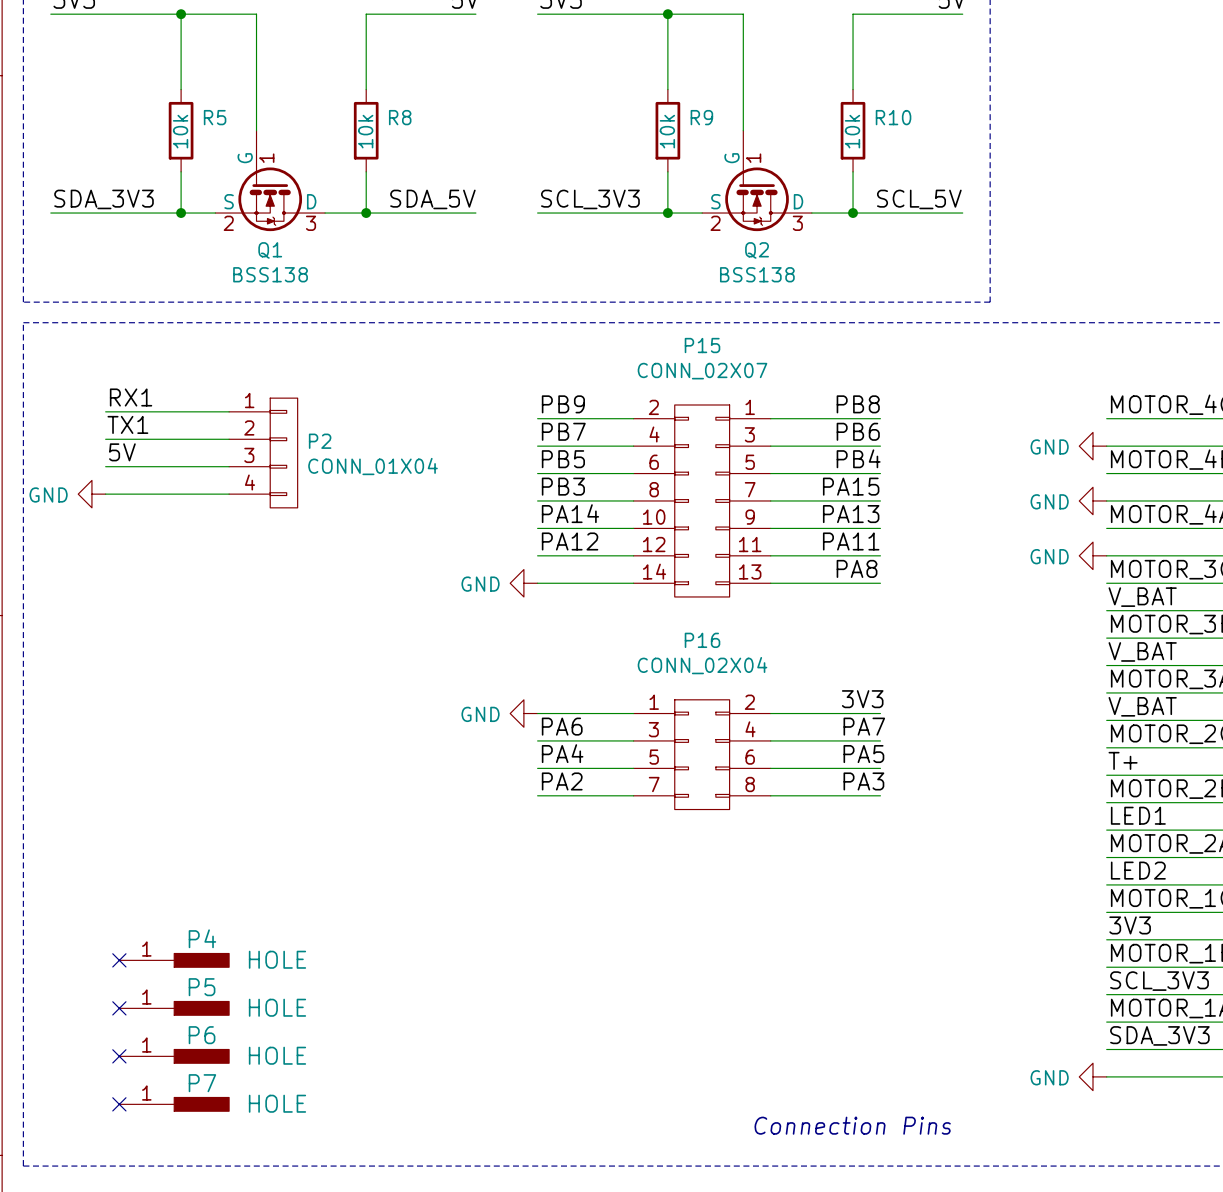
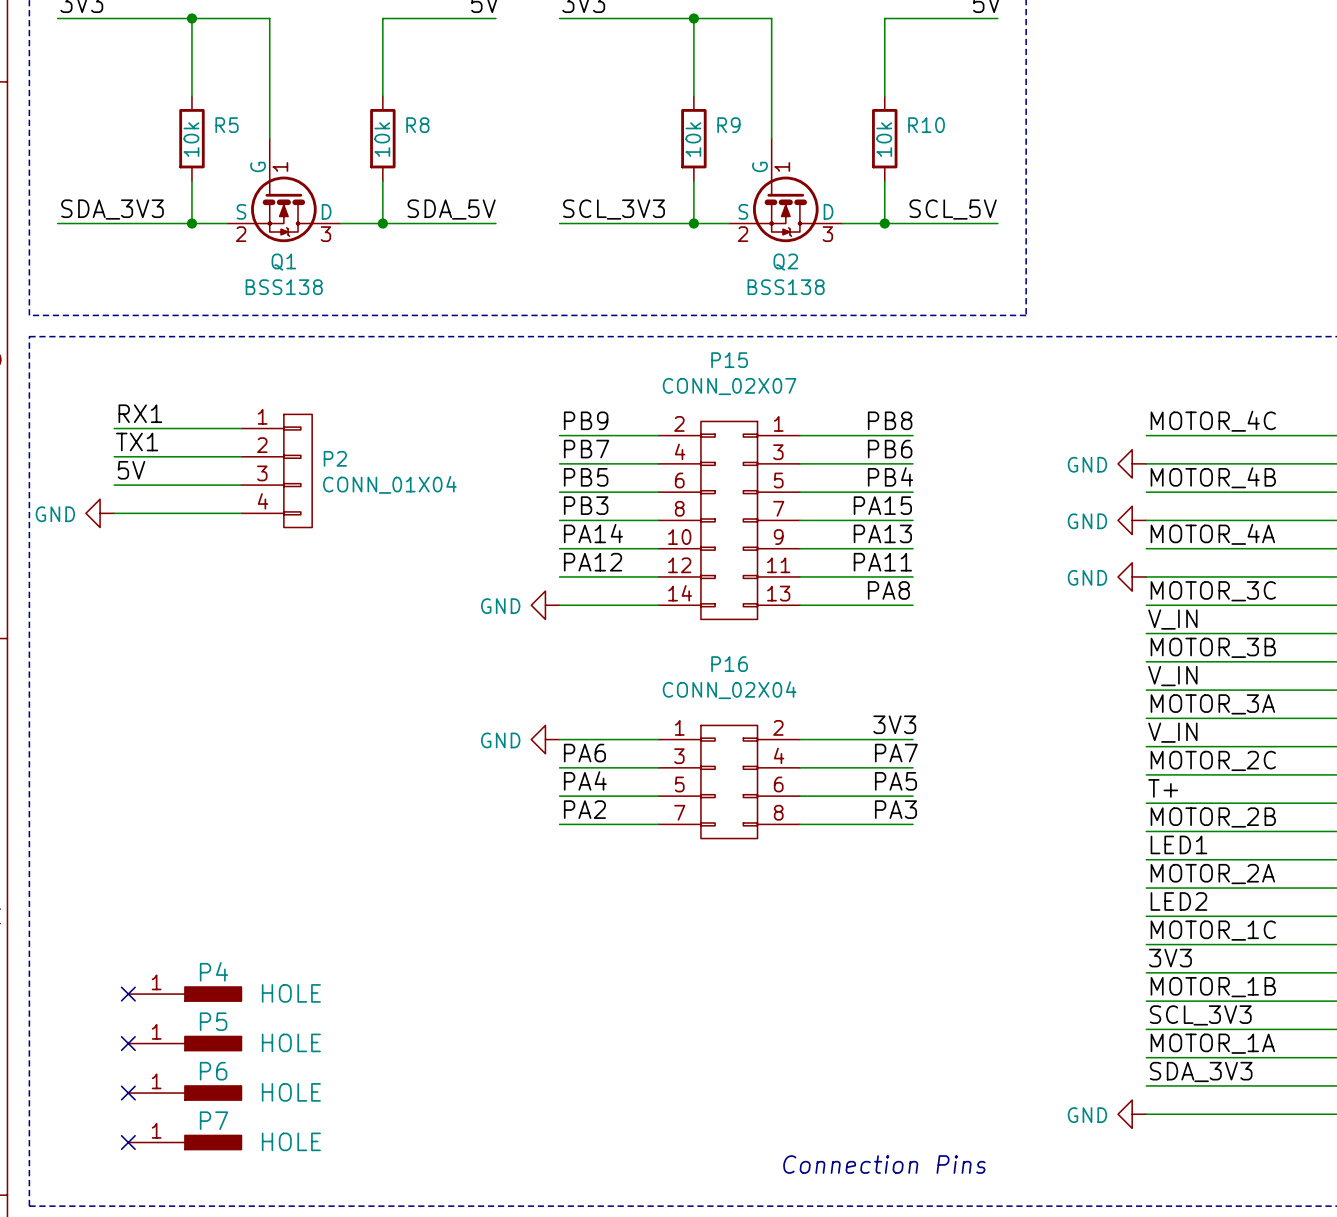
label: V_BAT (1142, 597) -> V_IN (1172, 619)
label: V_BAT (1142, 651) -> V_IN (1172, 676)
label: V_BAT (1142, 706) -> V_IN (1172, 732)

